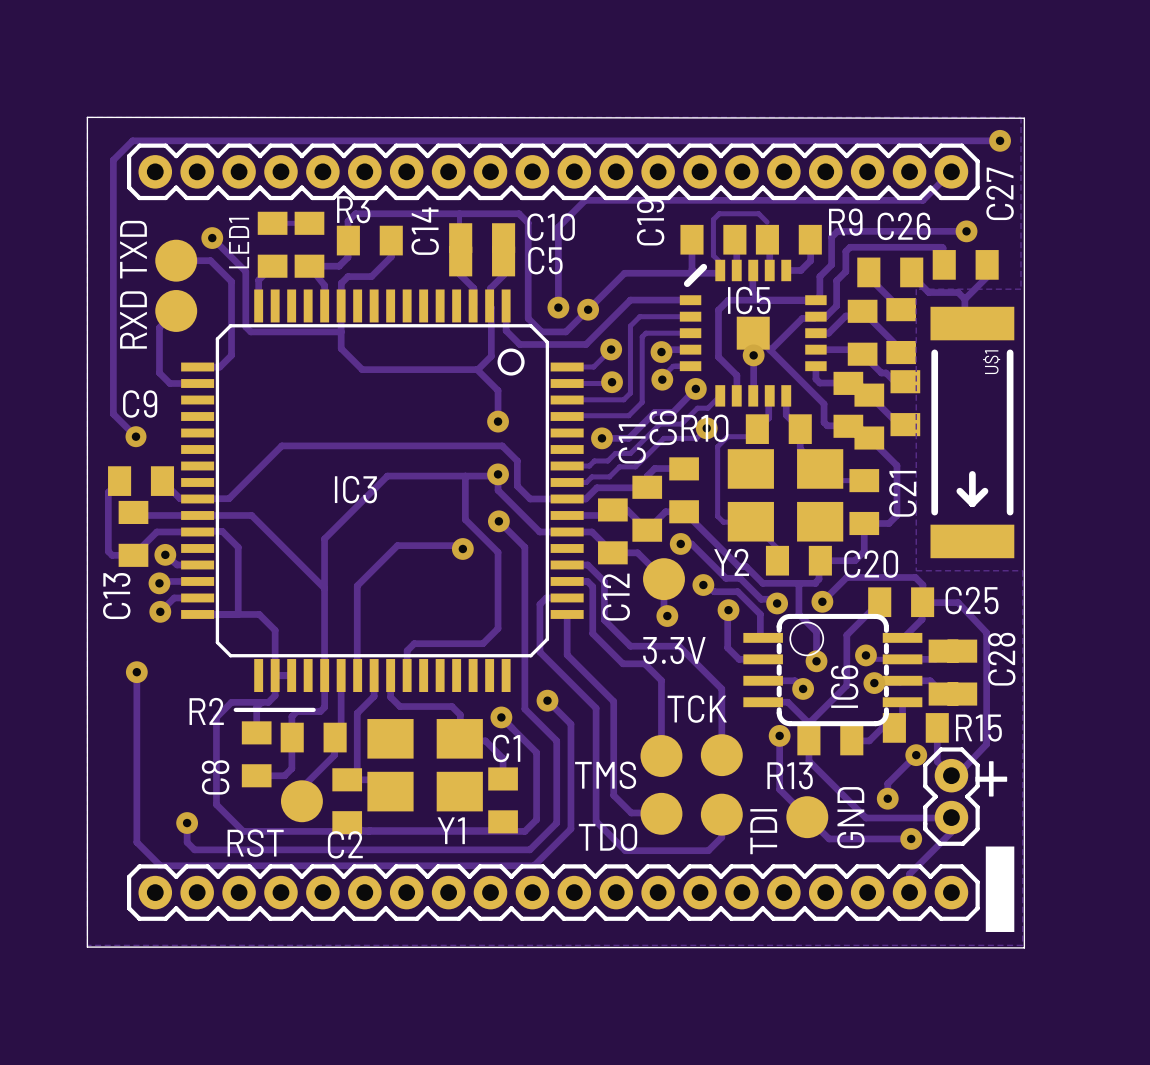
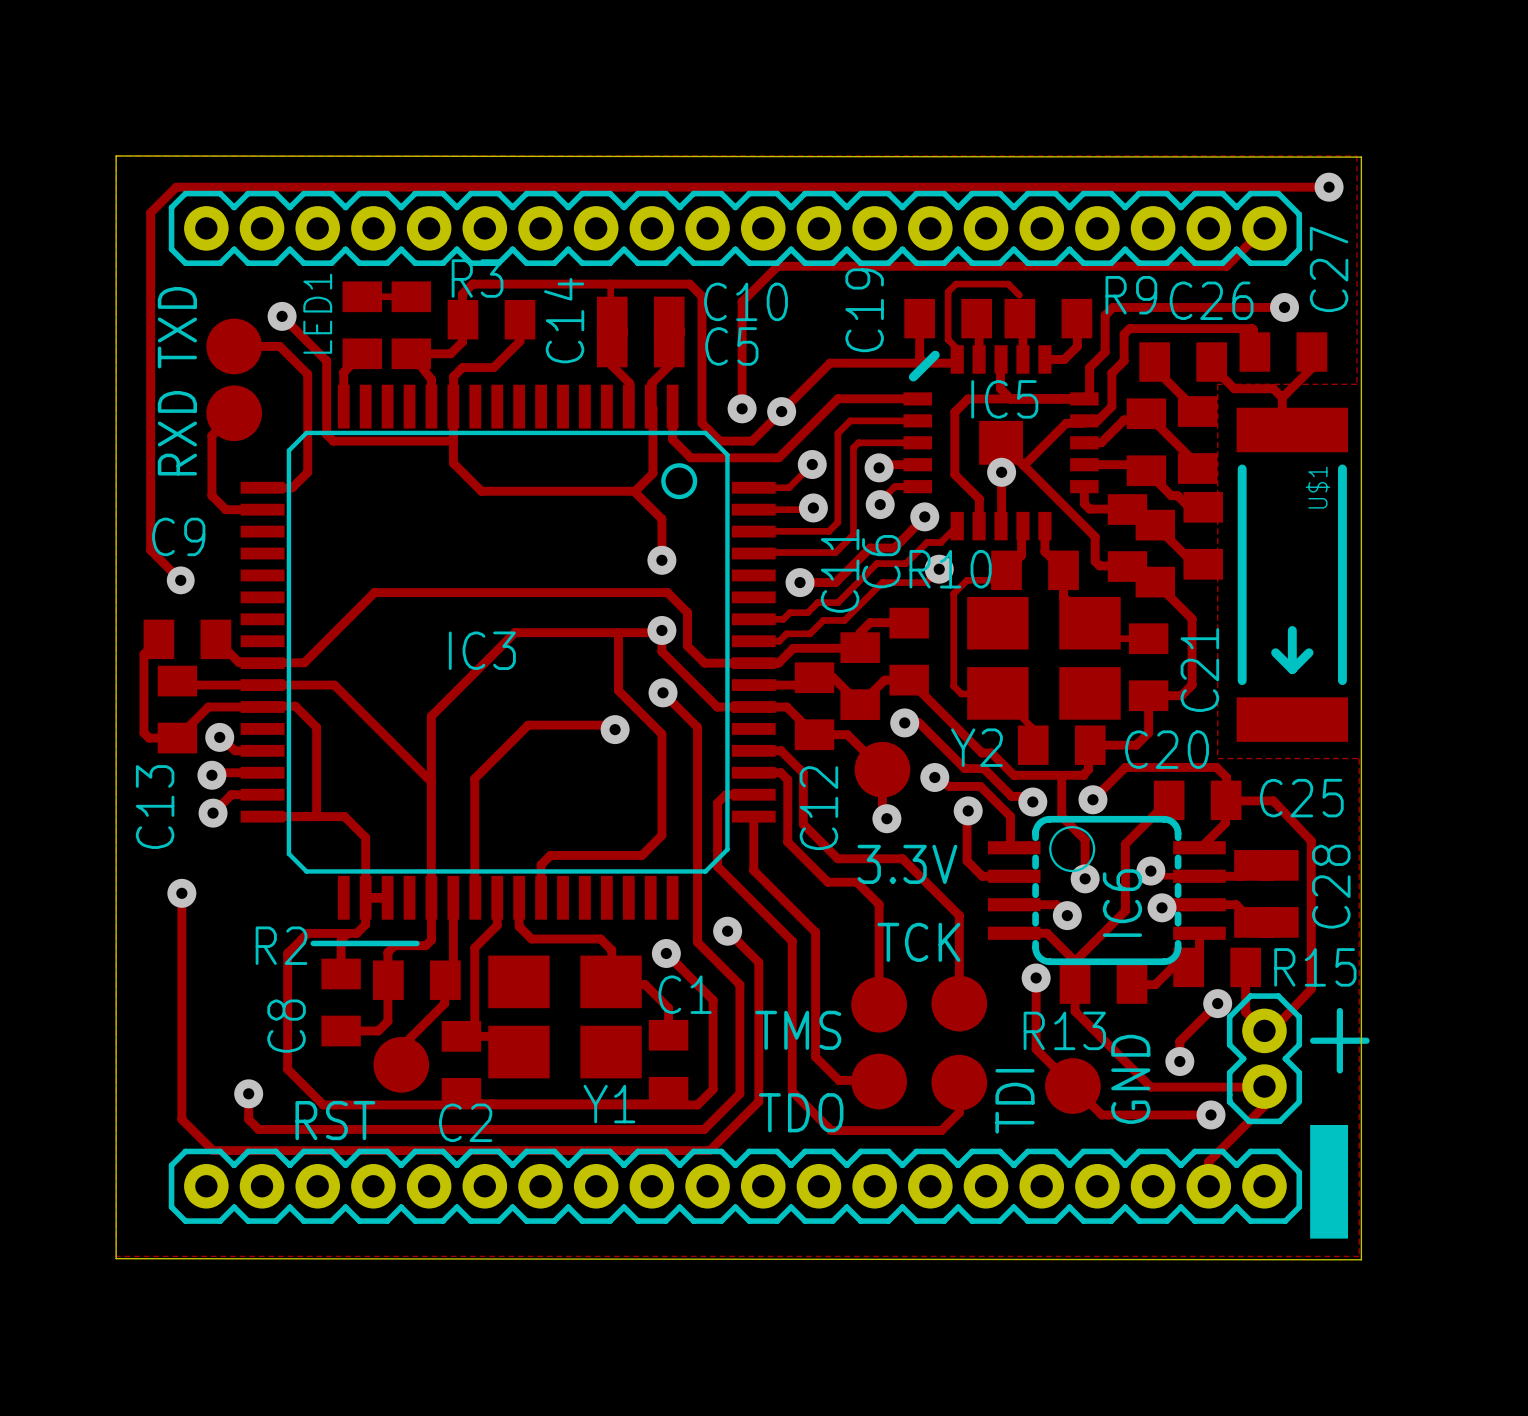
line: (87, 117) (1024, 118) (1024, 947) (87, 947) (87, 117) -> none
board edge: none -> (116, 155) (1361, 157) (1361, 1259) (116, 1258) (116, 155)

